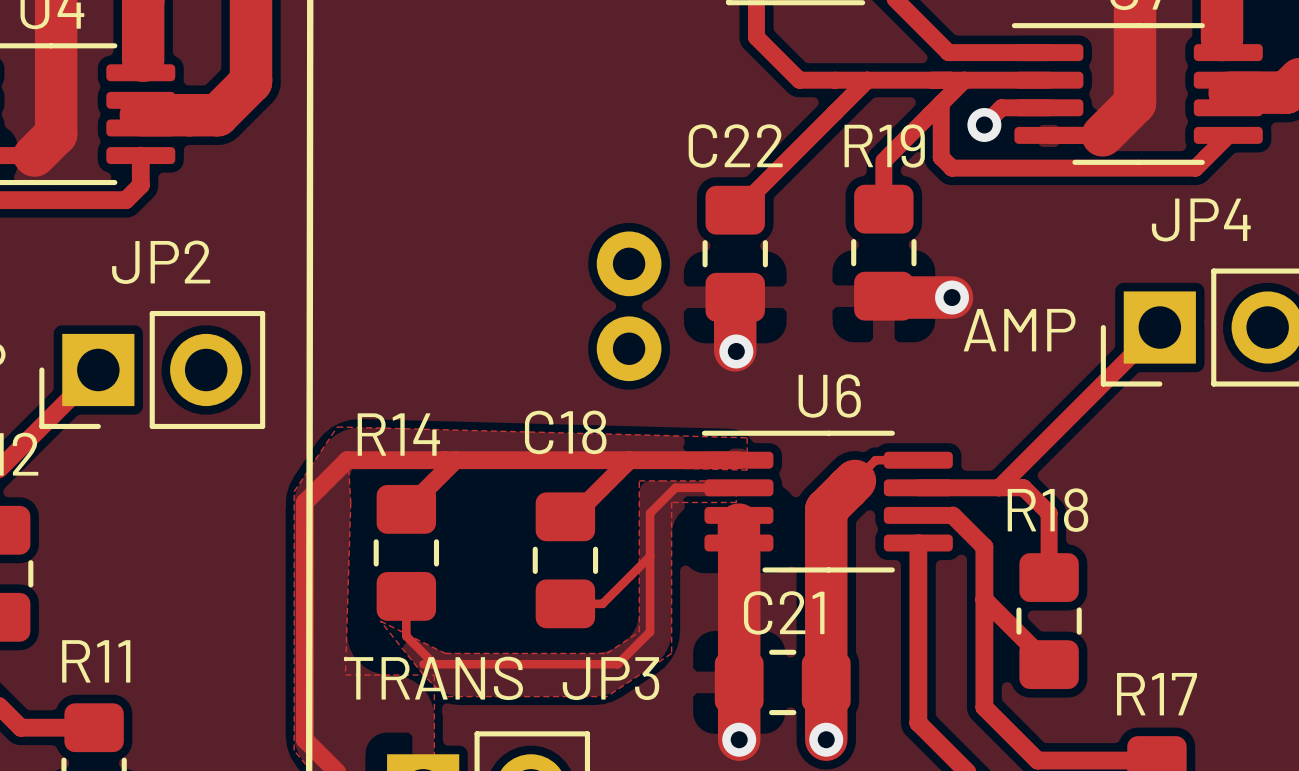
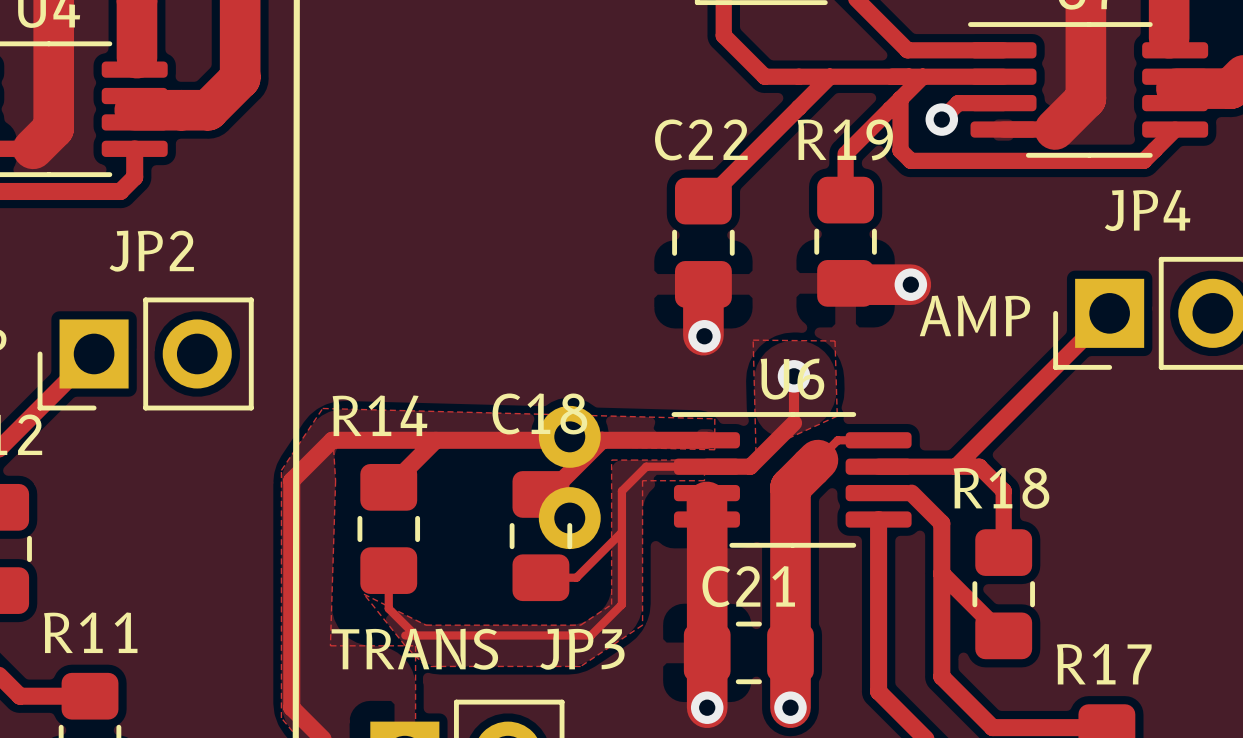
part position: (629, 306) -> (569, 477)
zone outline: none -> (753, 340) (756, 453) (837, 416) (835, 340) (753, 340)
track: none -> (794, 376) (794, 423) (750, 466) (706, 466)
via: none -> (794, 376)

